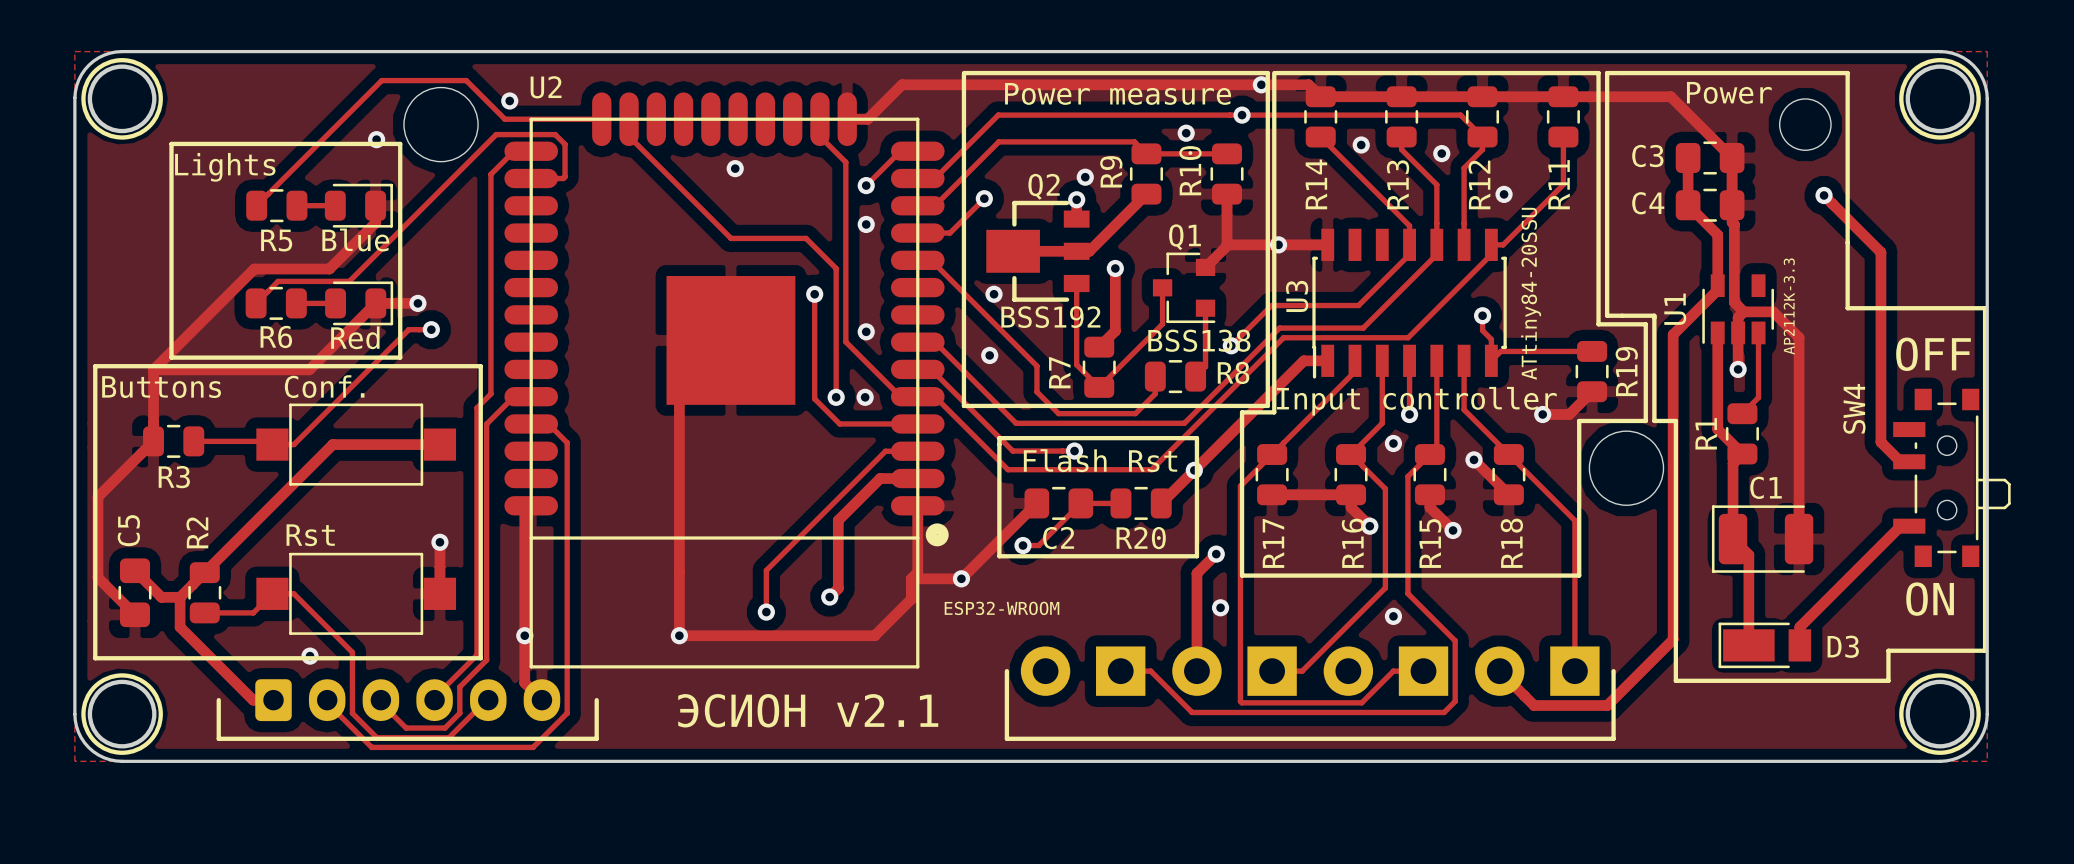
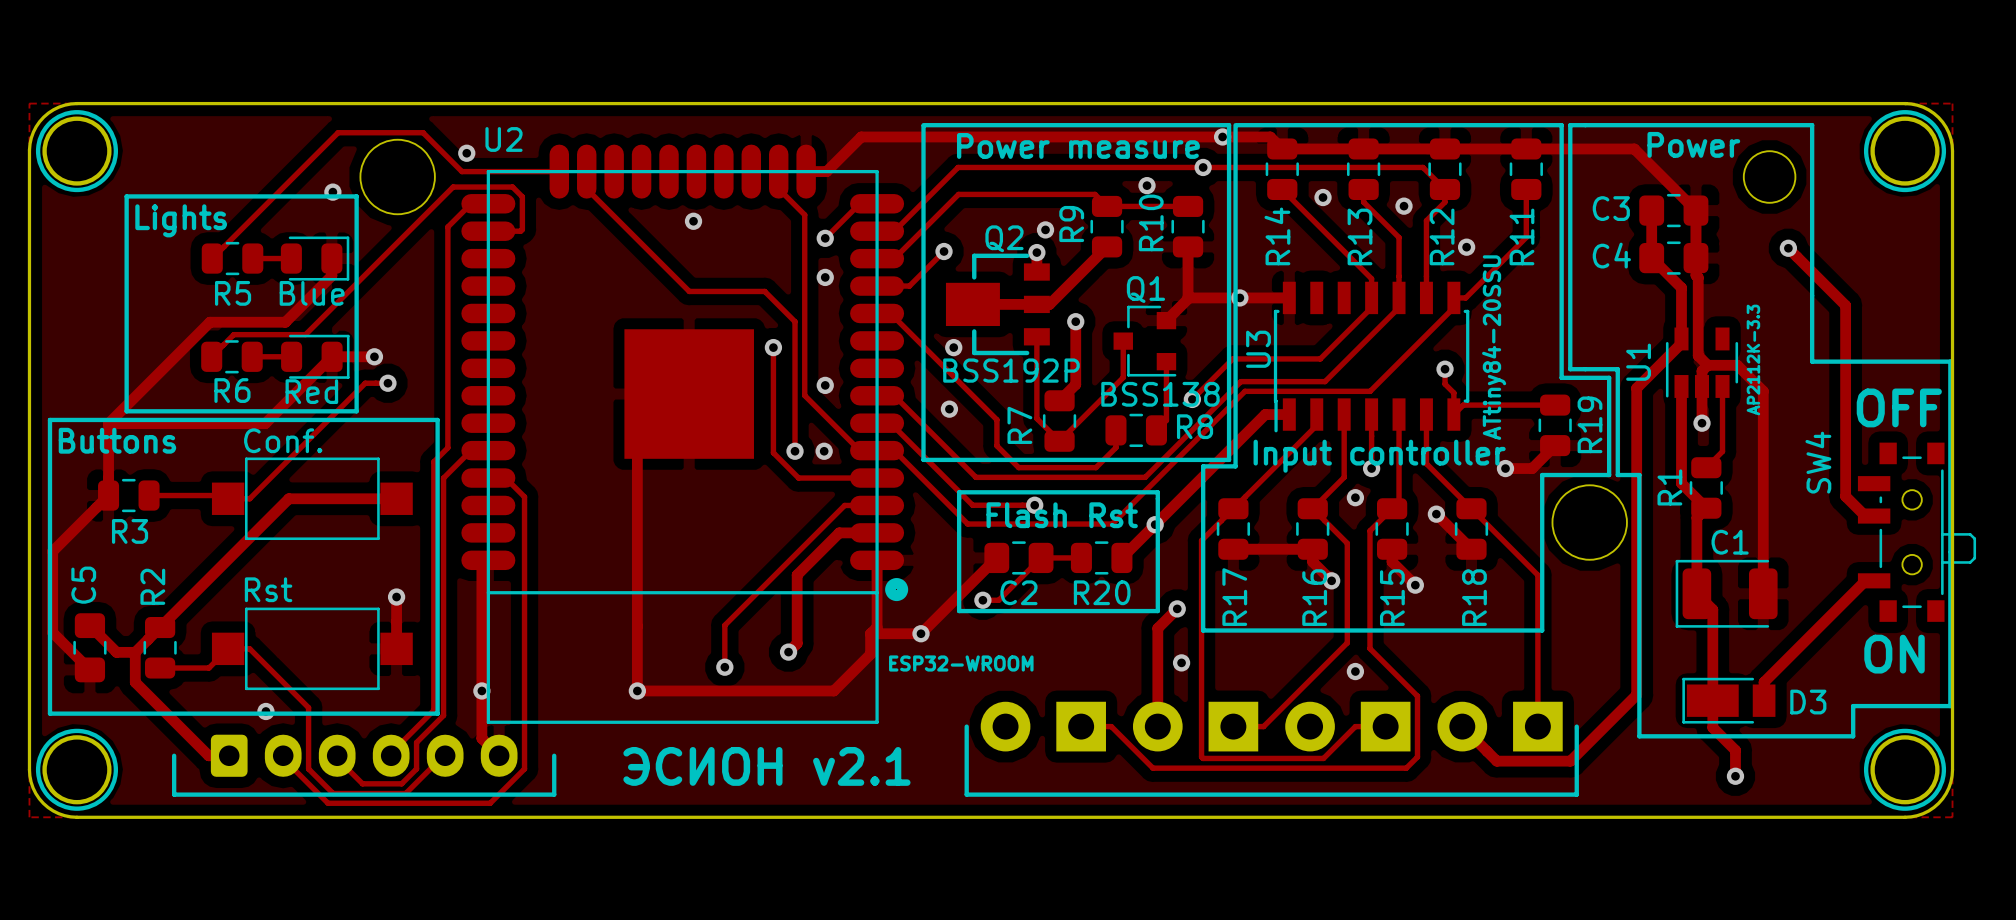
Q2 value: BSS192 (1050, 317) -> BSS192P (1011, 370)
track: none -> (1712, 700) (1712, 727) (1735, 750) (1735, 776)
via: none -> (1735, 776)

